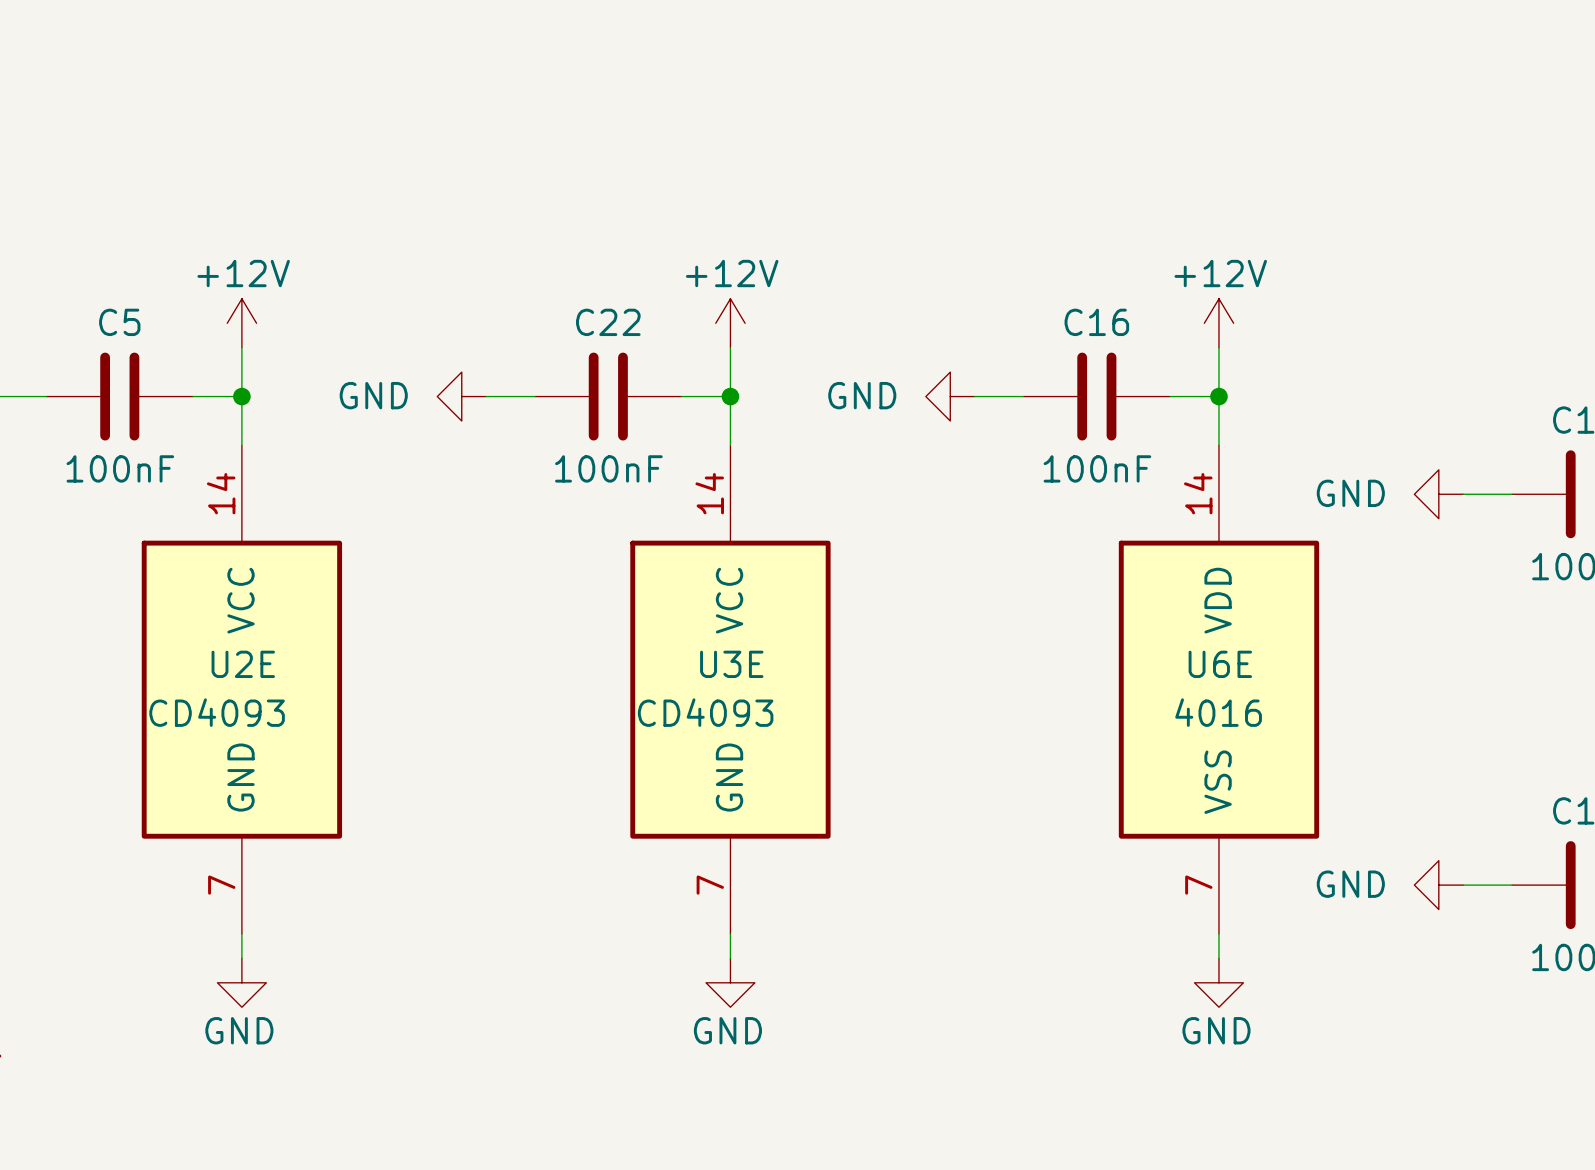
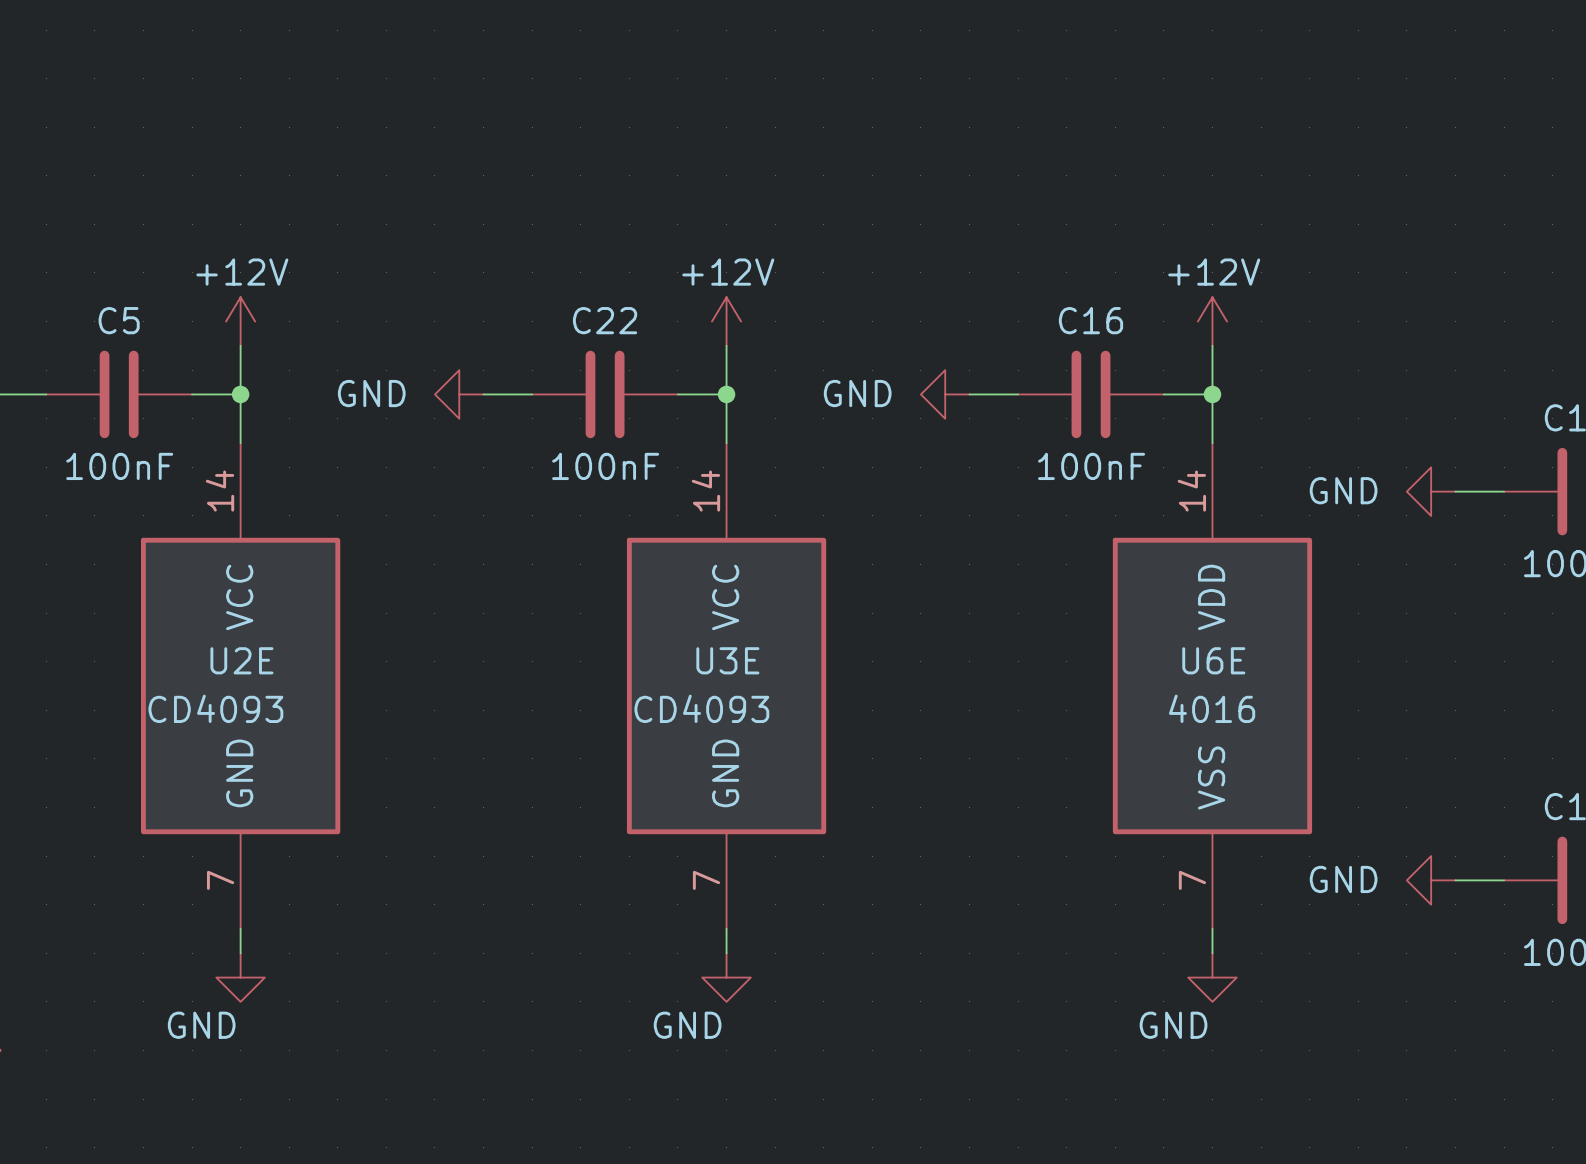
power symbol text position: GND (239, 1030) -> GND (201, 1025)
power symbol text position: GND (727, 1030) -> GND (687, 1025)
power symbol text position: GND (1216, 1030) -> GND (1173, 1025)

